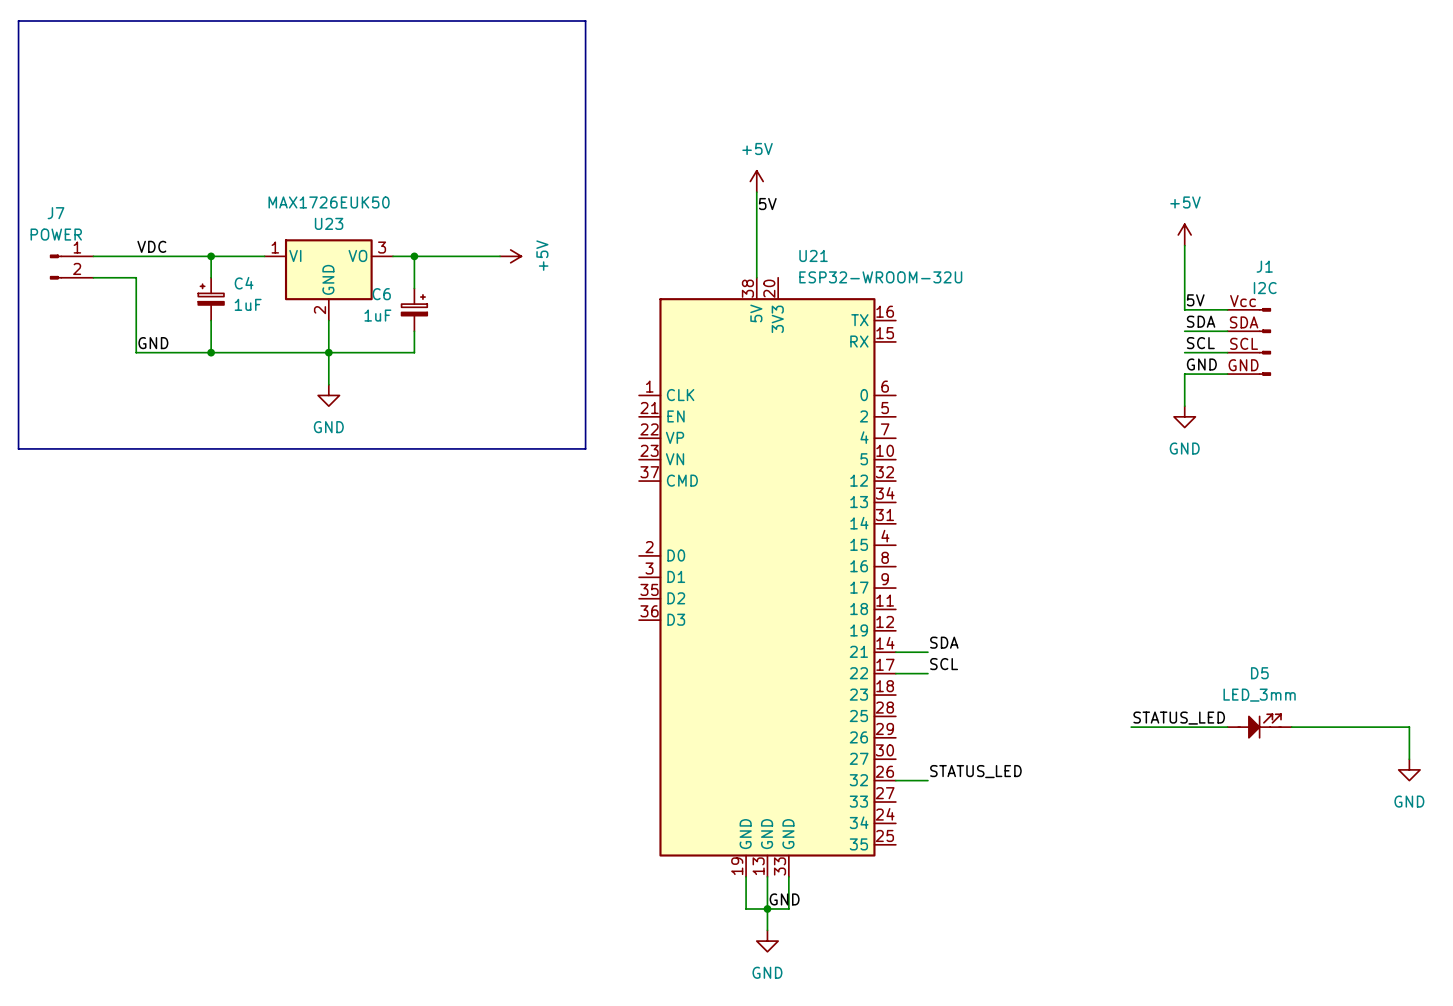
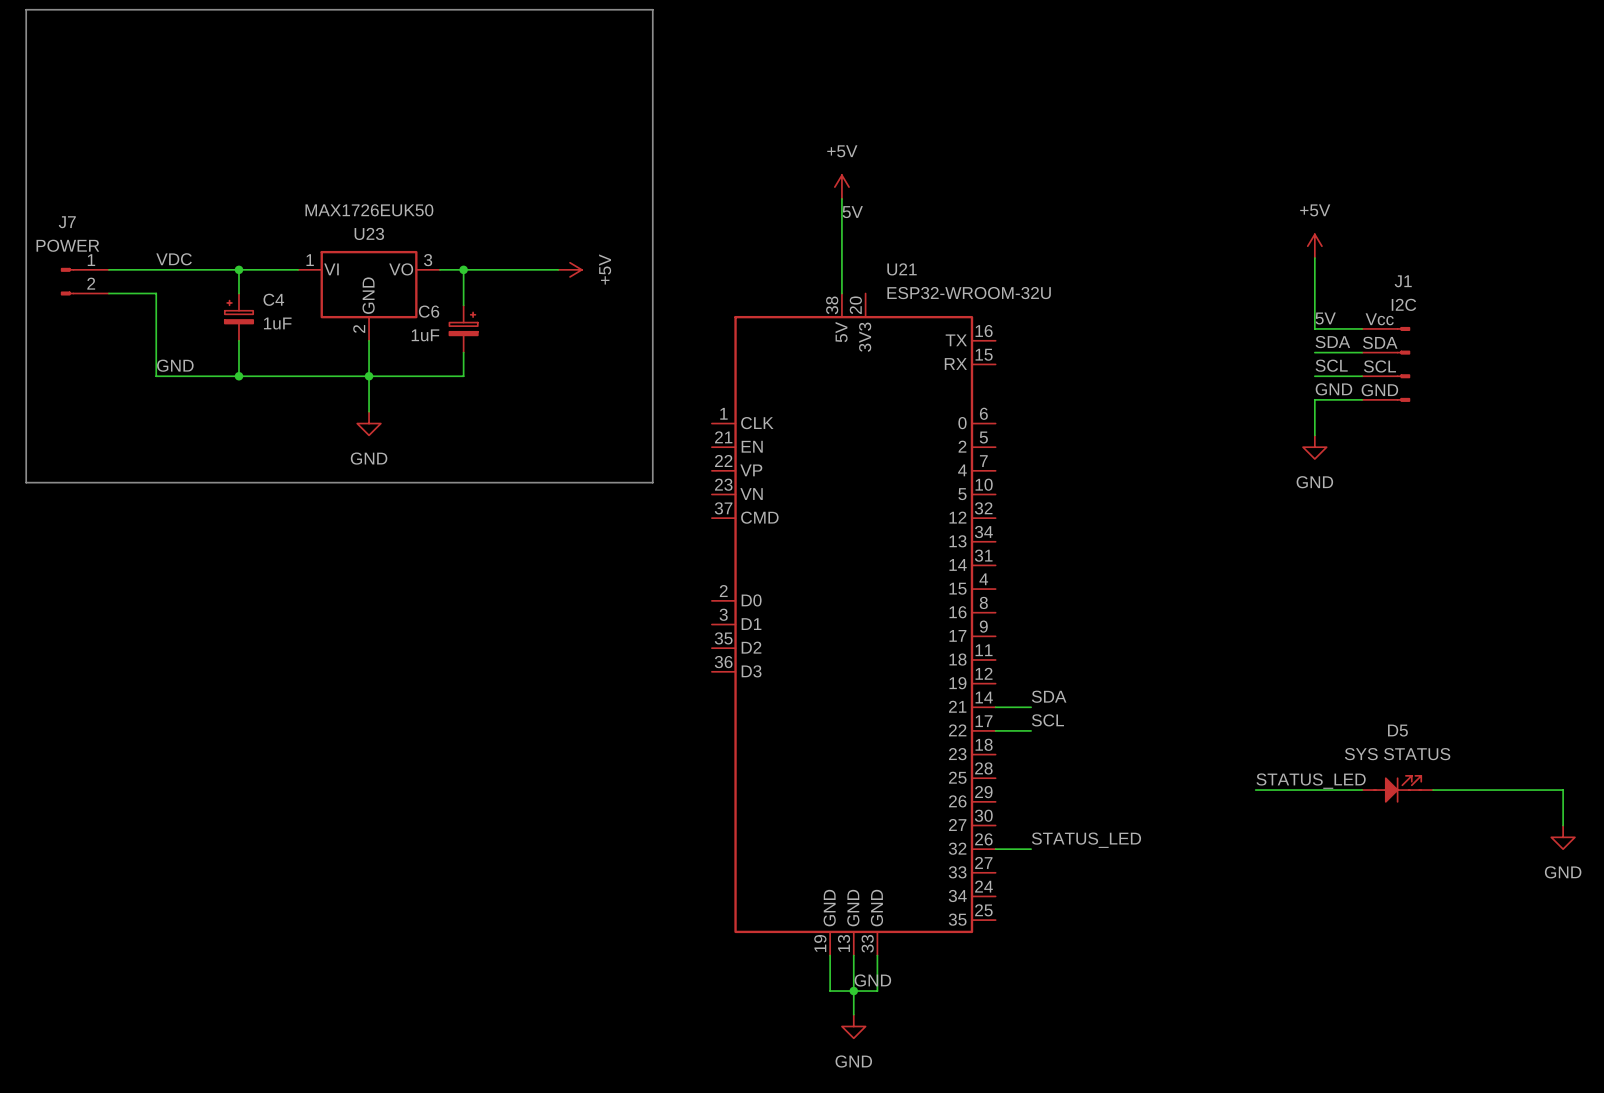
D5 value: LED_3mm (1259, 695) -> SYS STATUS (1397, 754)

